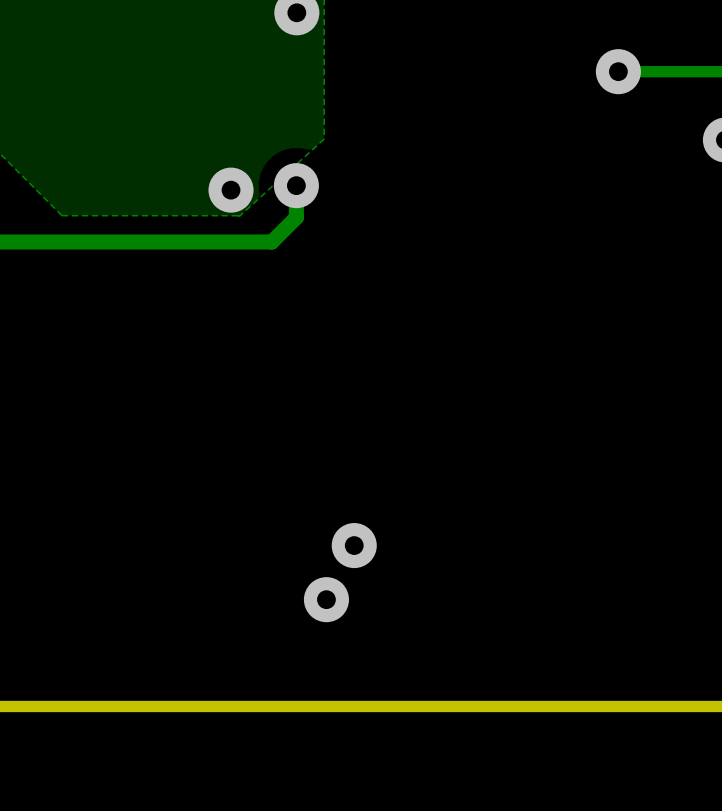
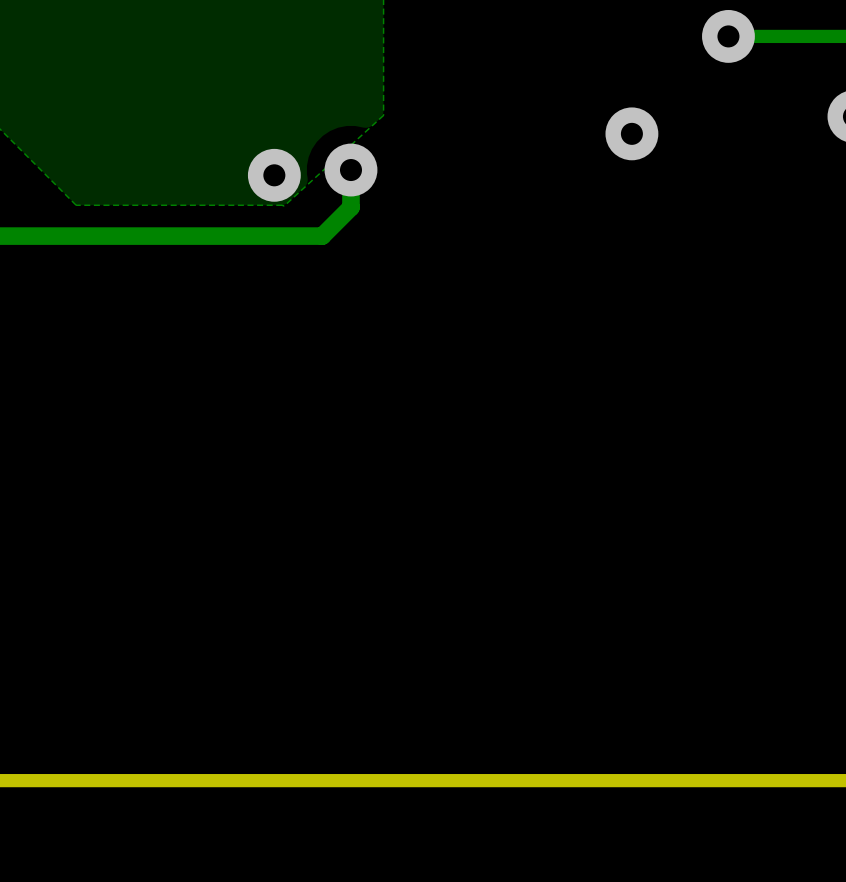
via: none -> (631, 133)
via: (354, 545) -> none
via: (326, 599) -> none

